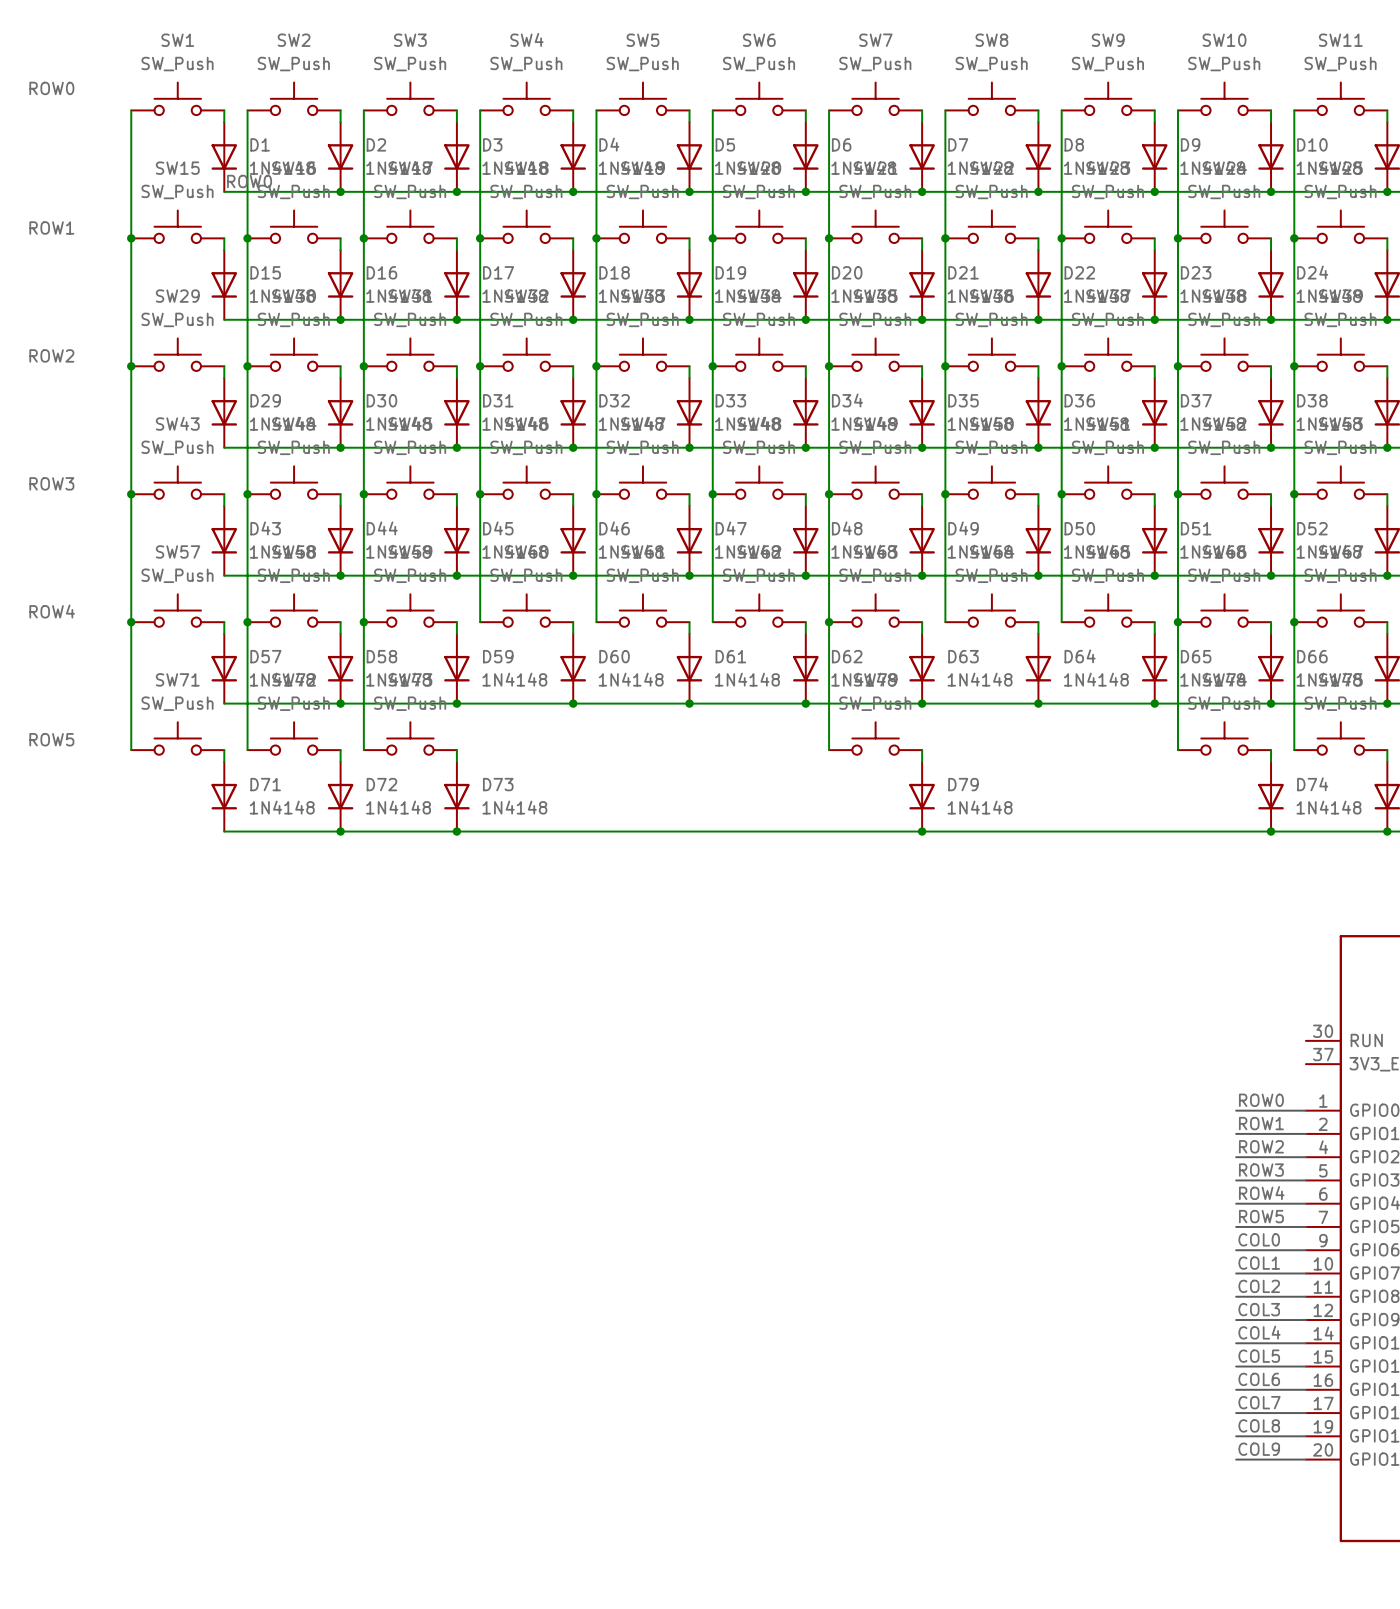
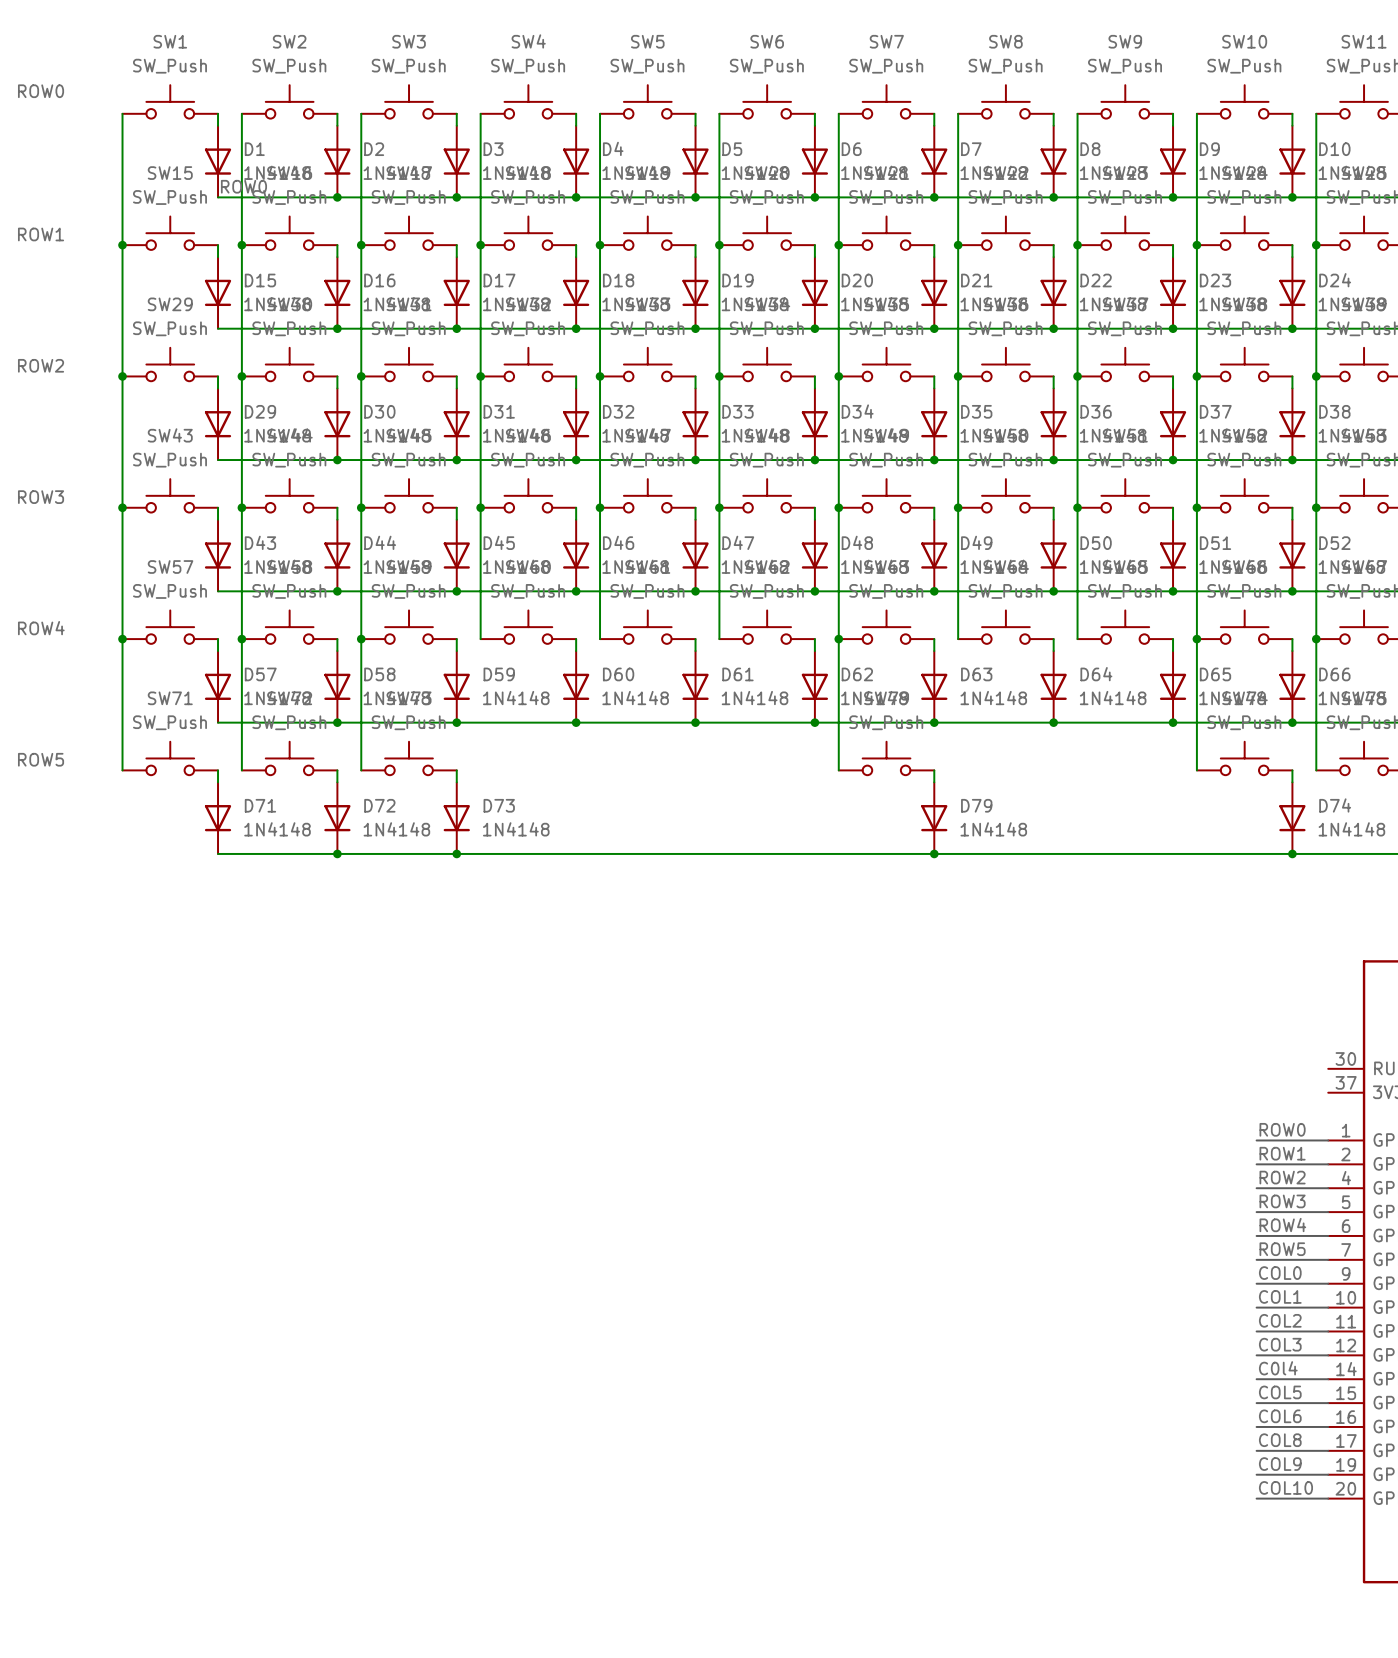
label: COL4 (1259, 1332) -> C0l4 (1278, 1368)
label: COL7 (1259, 1402) -> COL8 (1280, 1440)
label: COL8 (1259, 1425) -> COL9 (1280, 1464)
label: COL9 (1259, 1449) -> COL10 (1285, 1487)

